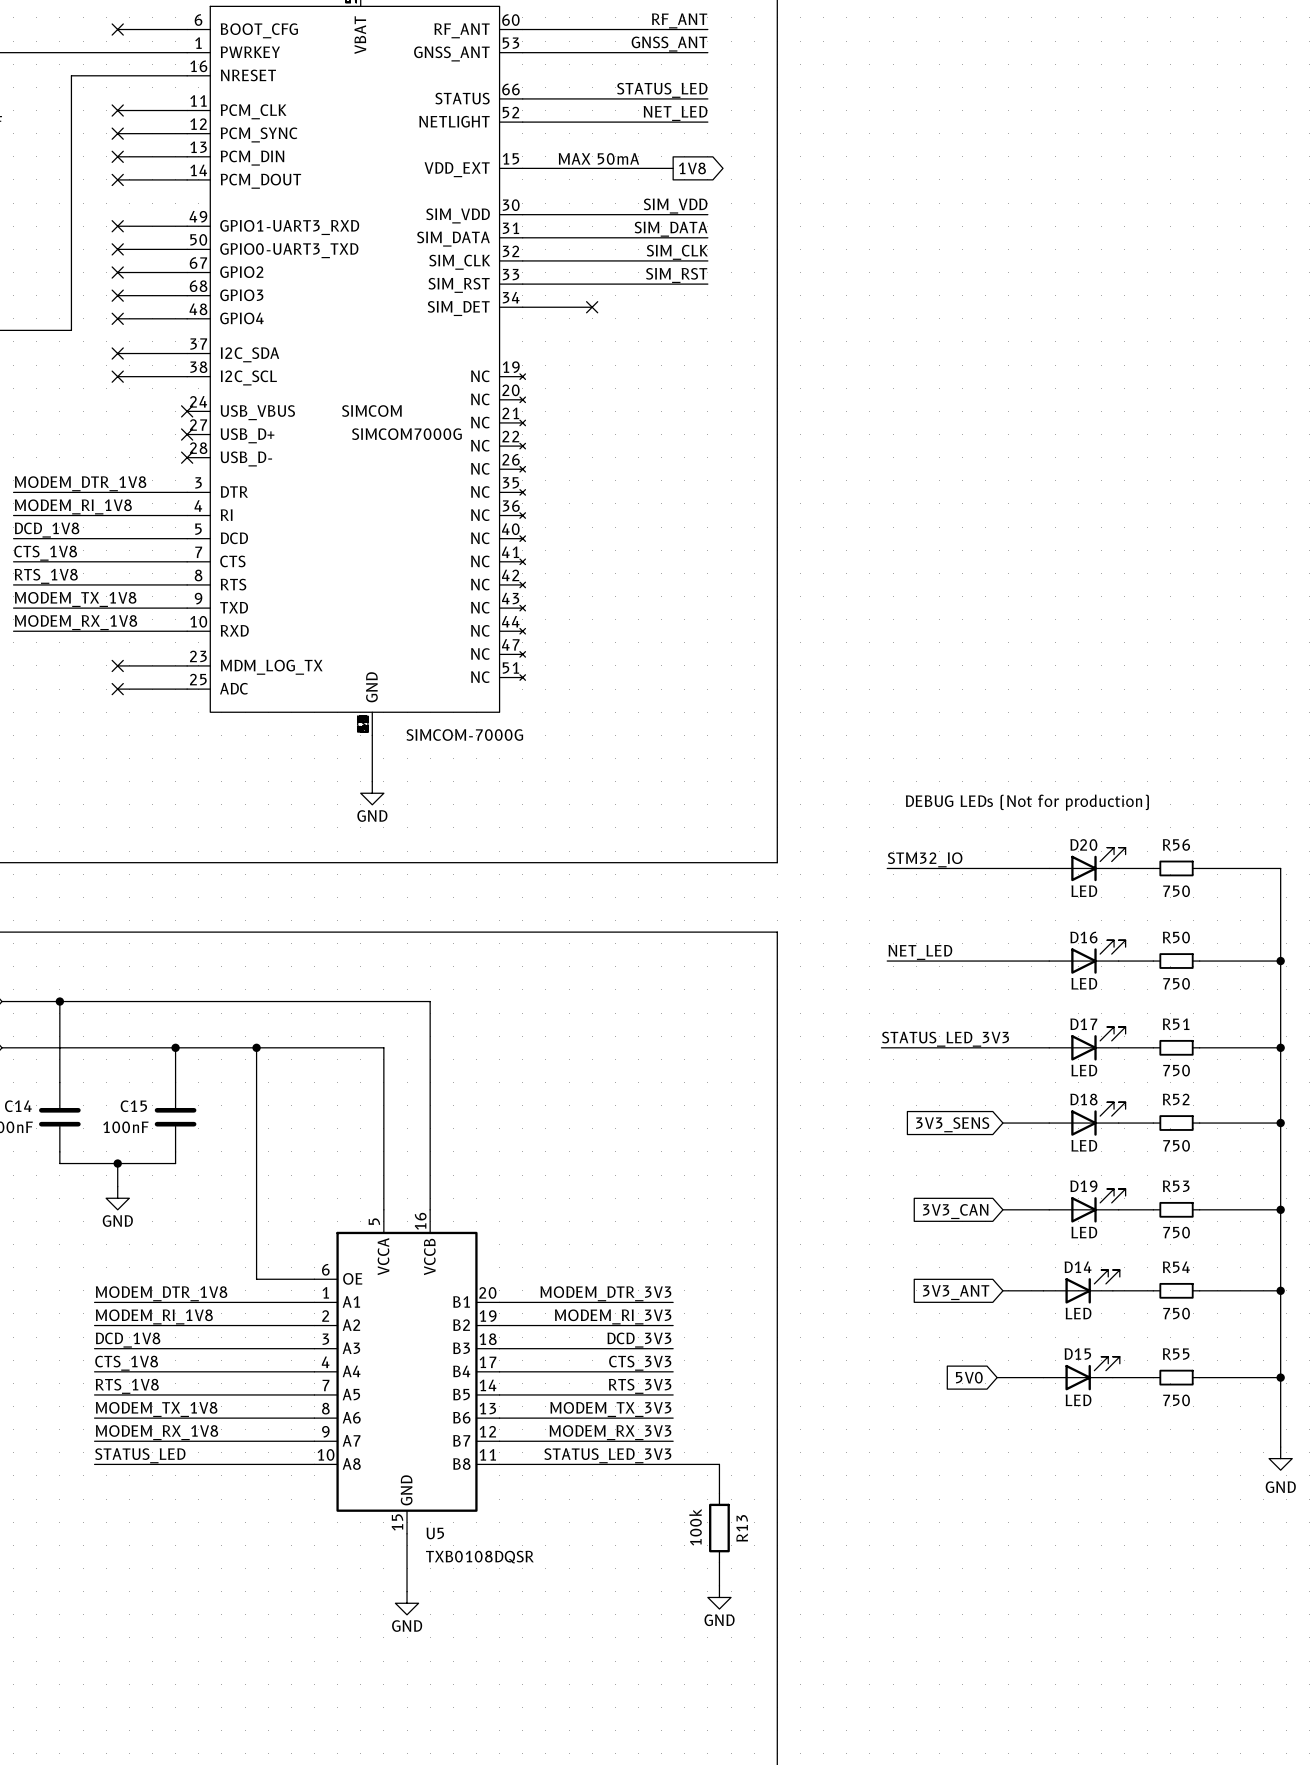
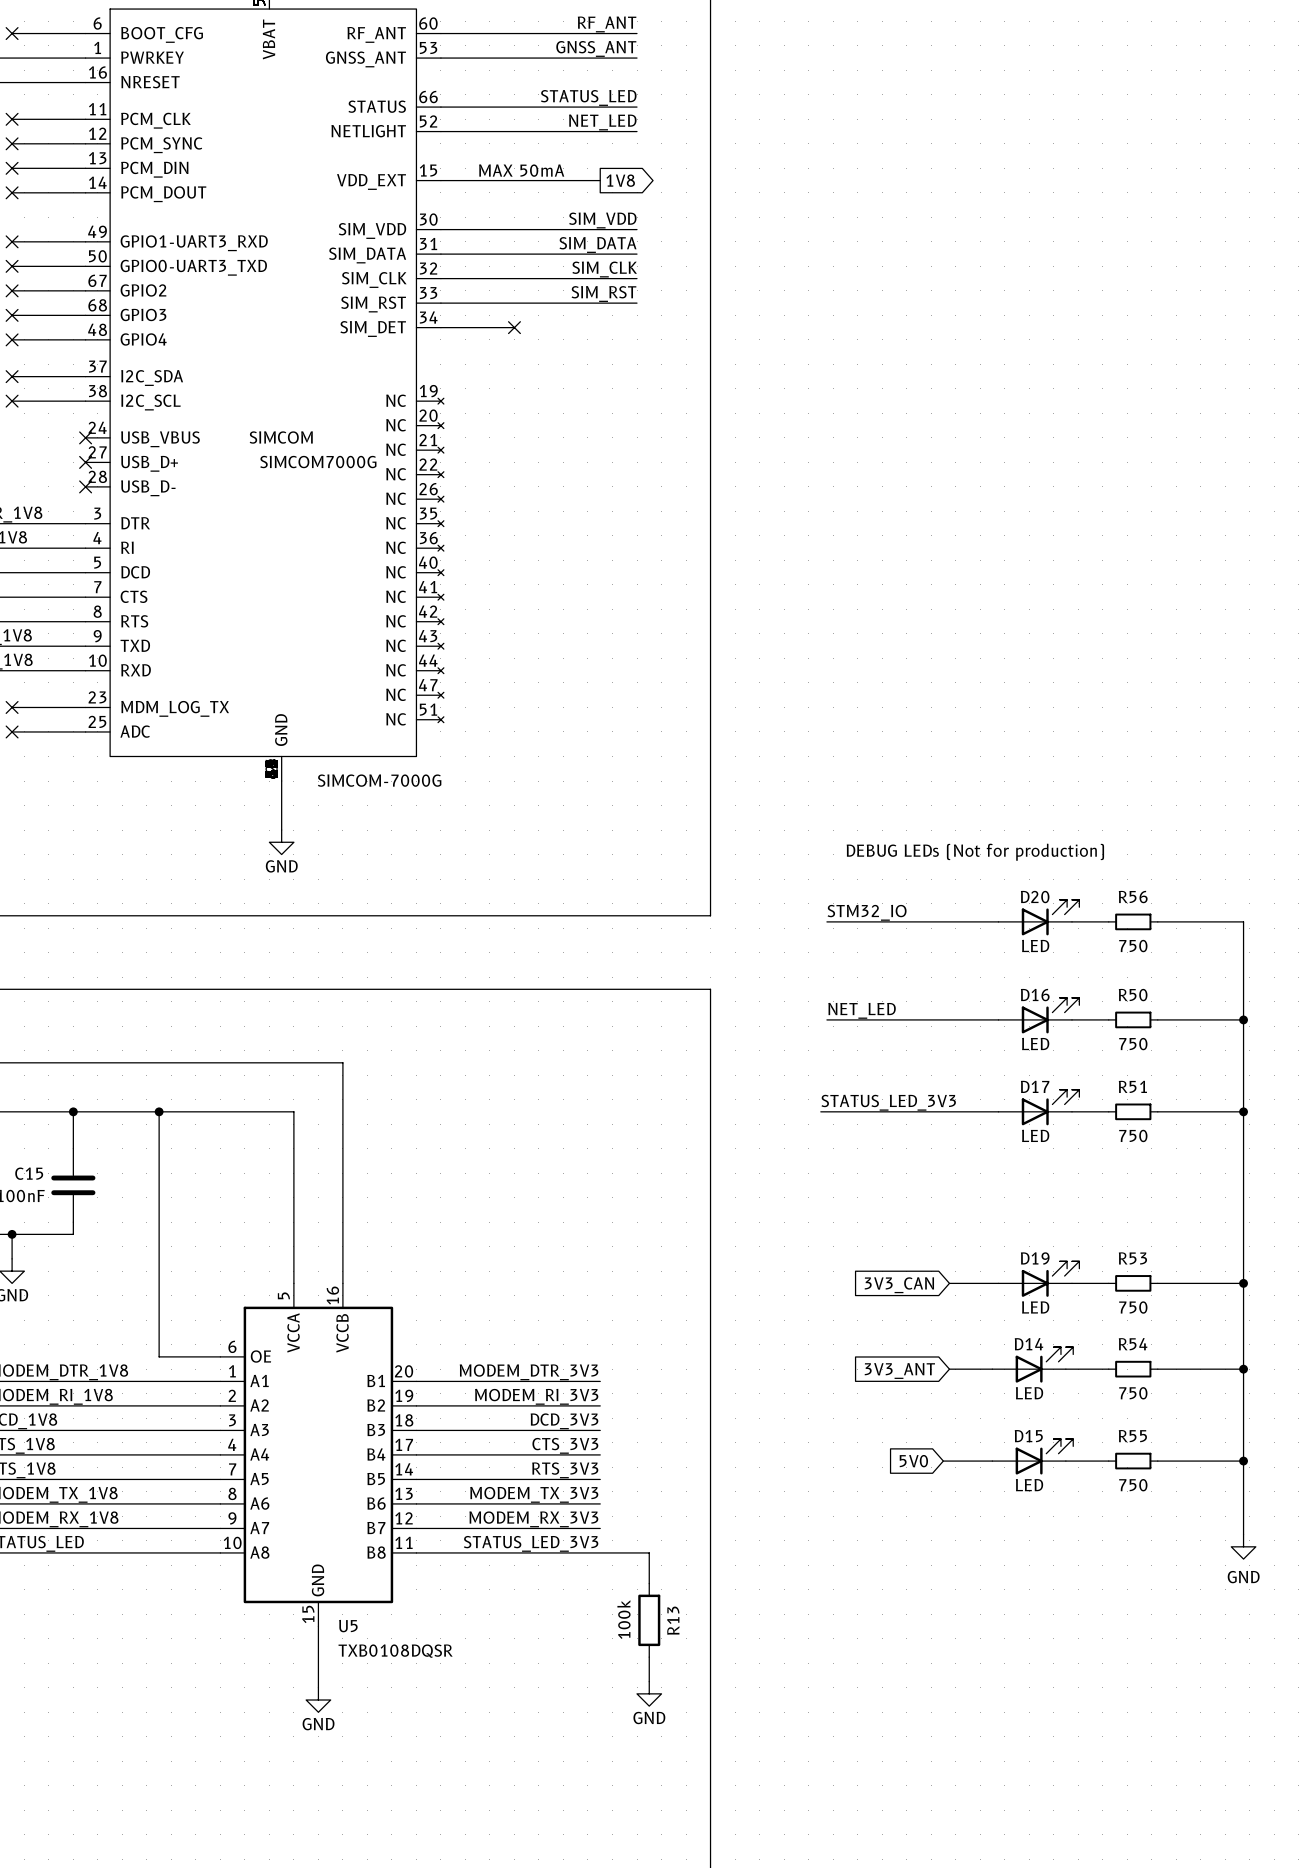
D18: LED (1087, 1118) -> none
wire: (1002, 1123) (1049, 1123) -> none
wire: (1118, 1123) (1153, 1123) -> none
R52: 750 (1176, 1123) -> none
wire: (1199, 1123) (1280, 1123) -> none
junction: (1280, 1123) -> none
global label: 3V3_SENS (952, 1124) -> none

